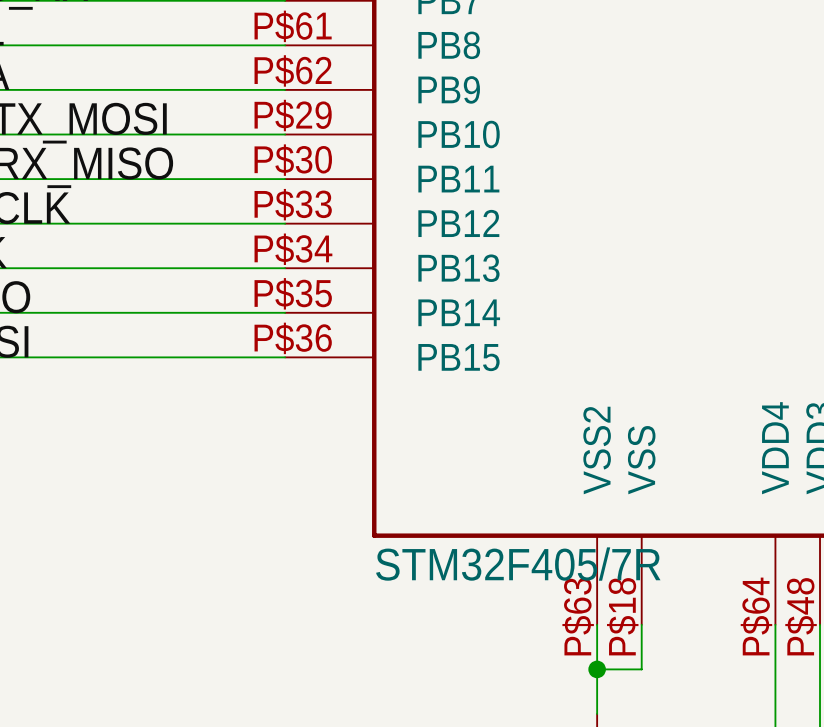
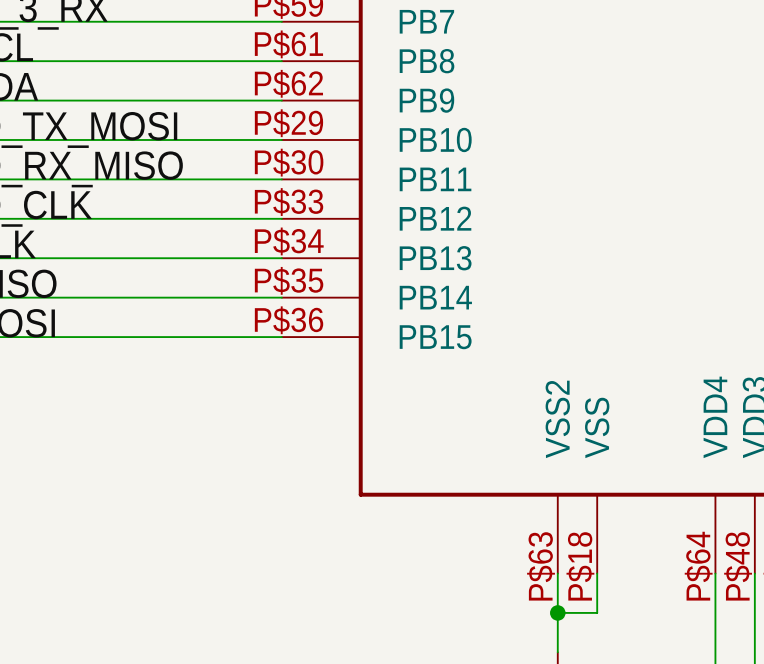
part value: STM32F405/7R (518, 564) -> none

